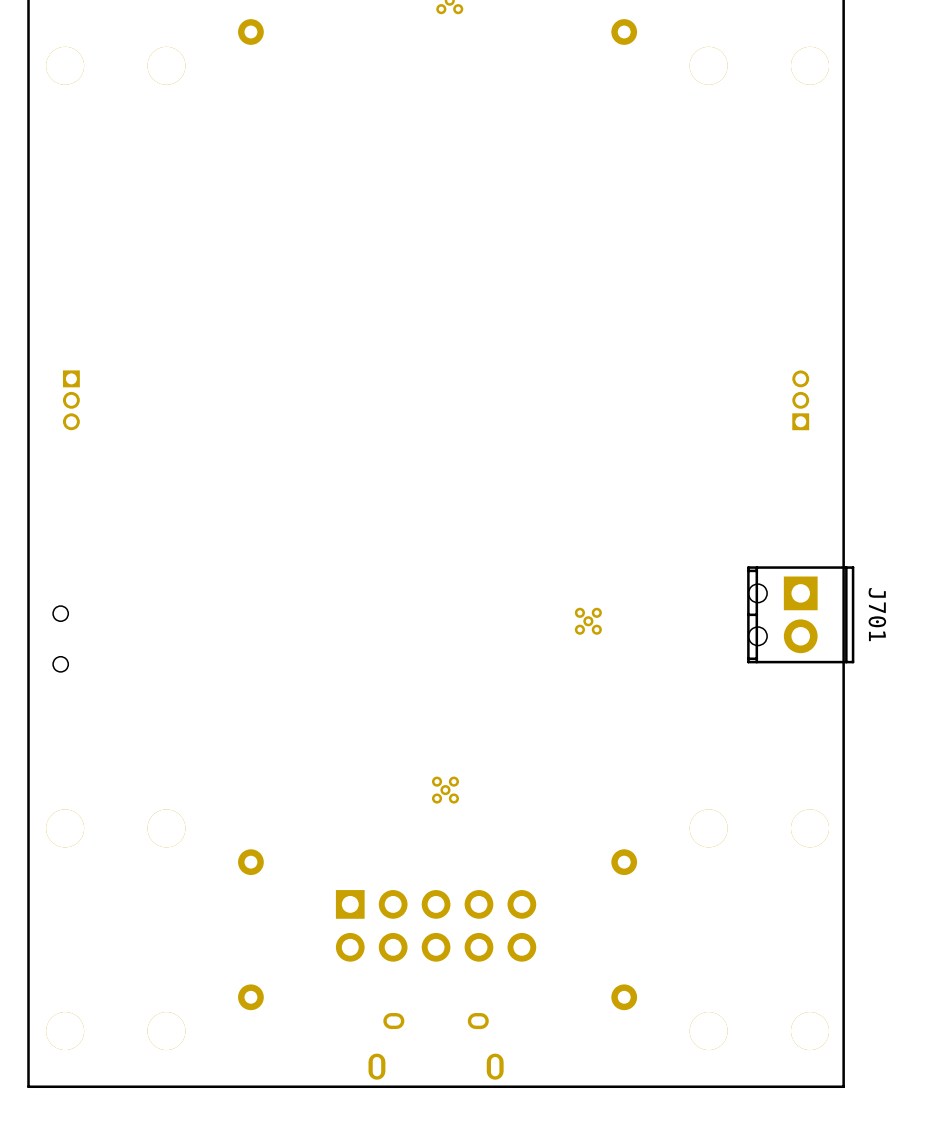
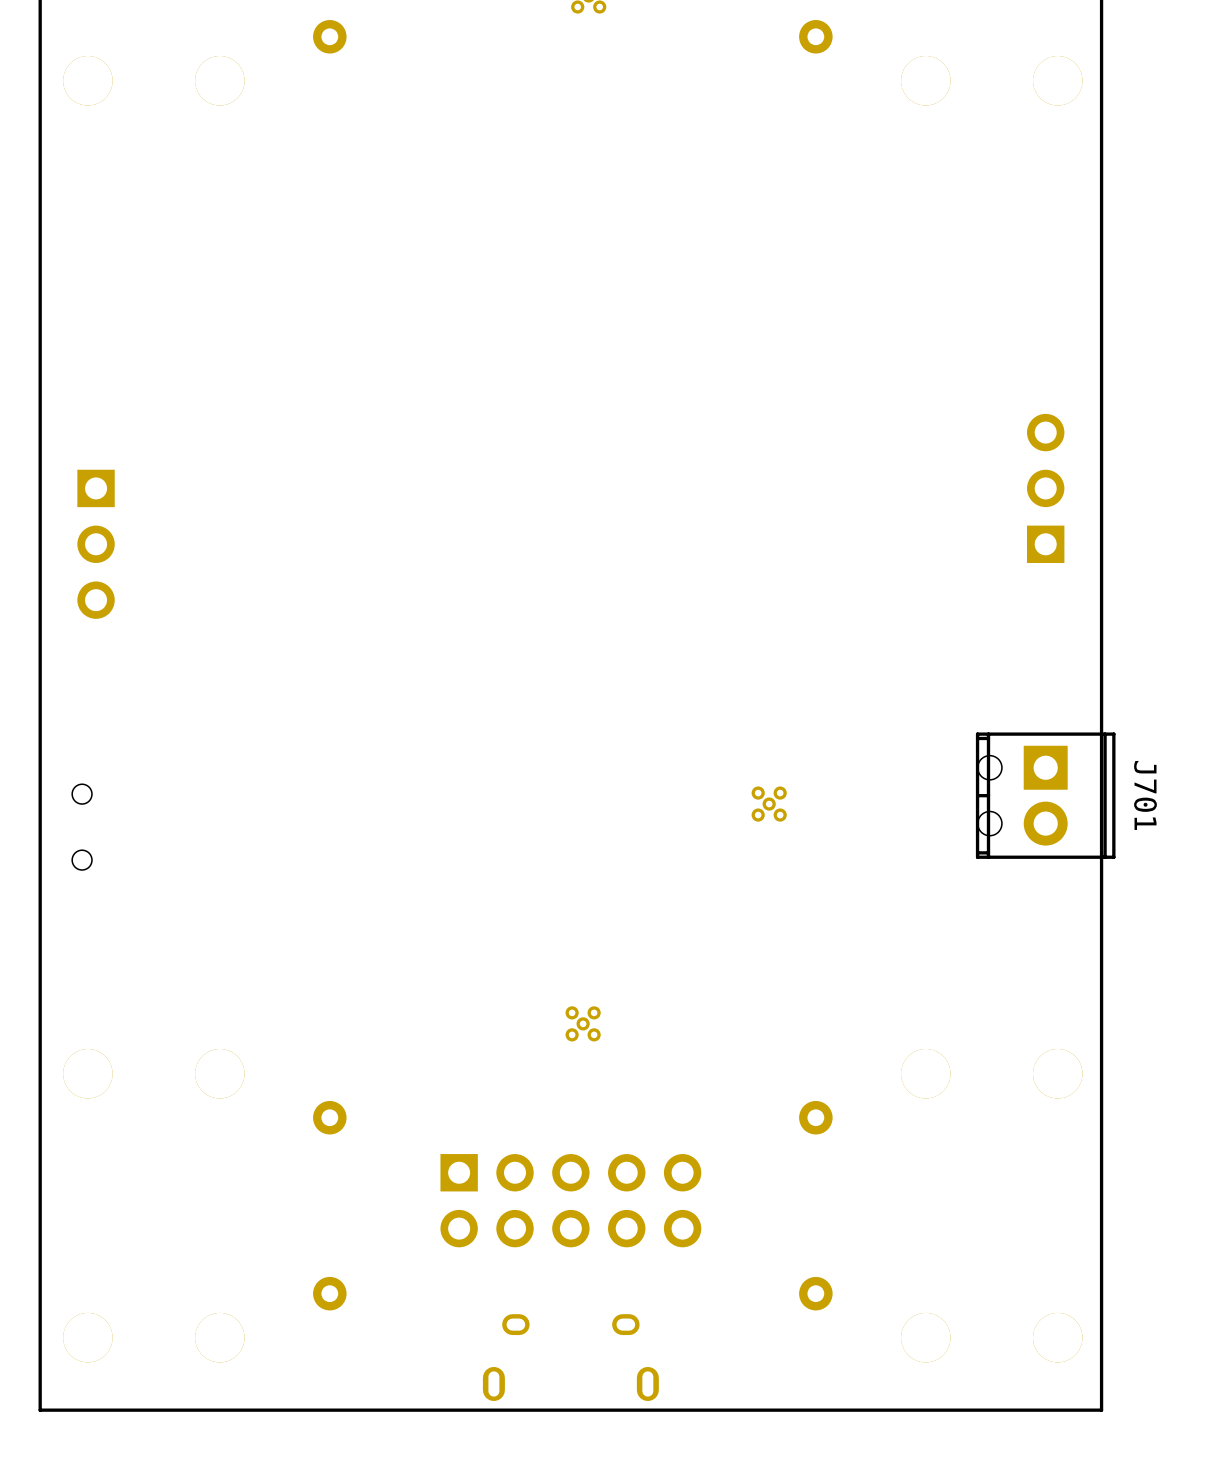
part: none -> (1045, 488)
part: (71, 400) -> none
part: (800, 400) -> none
part: none -> (96, 544)

